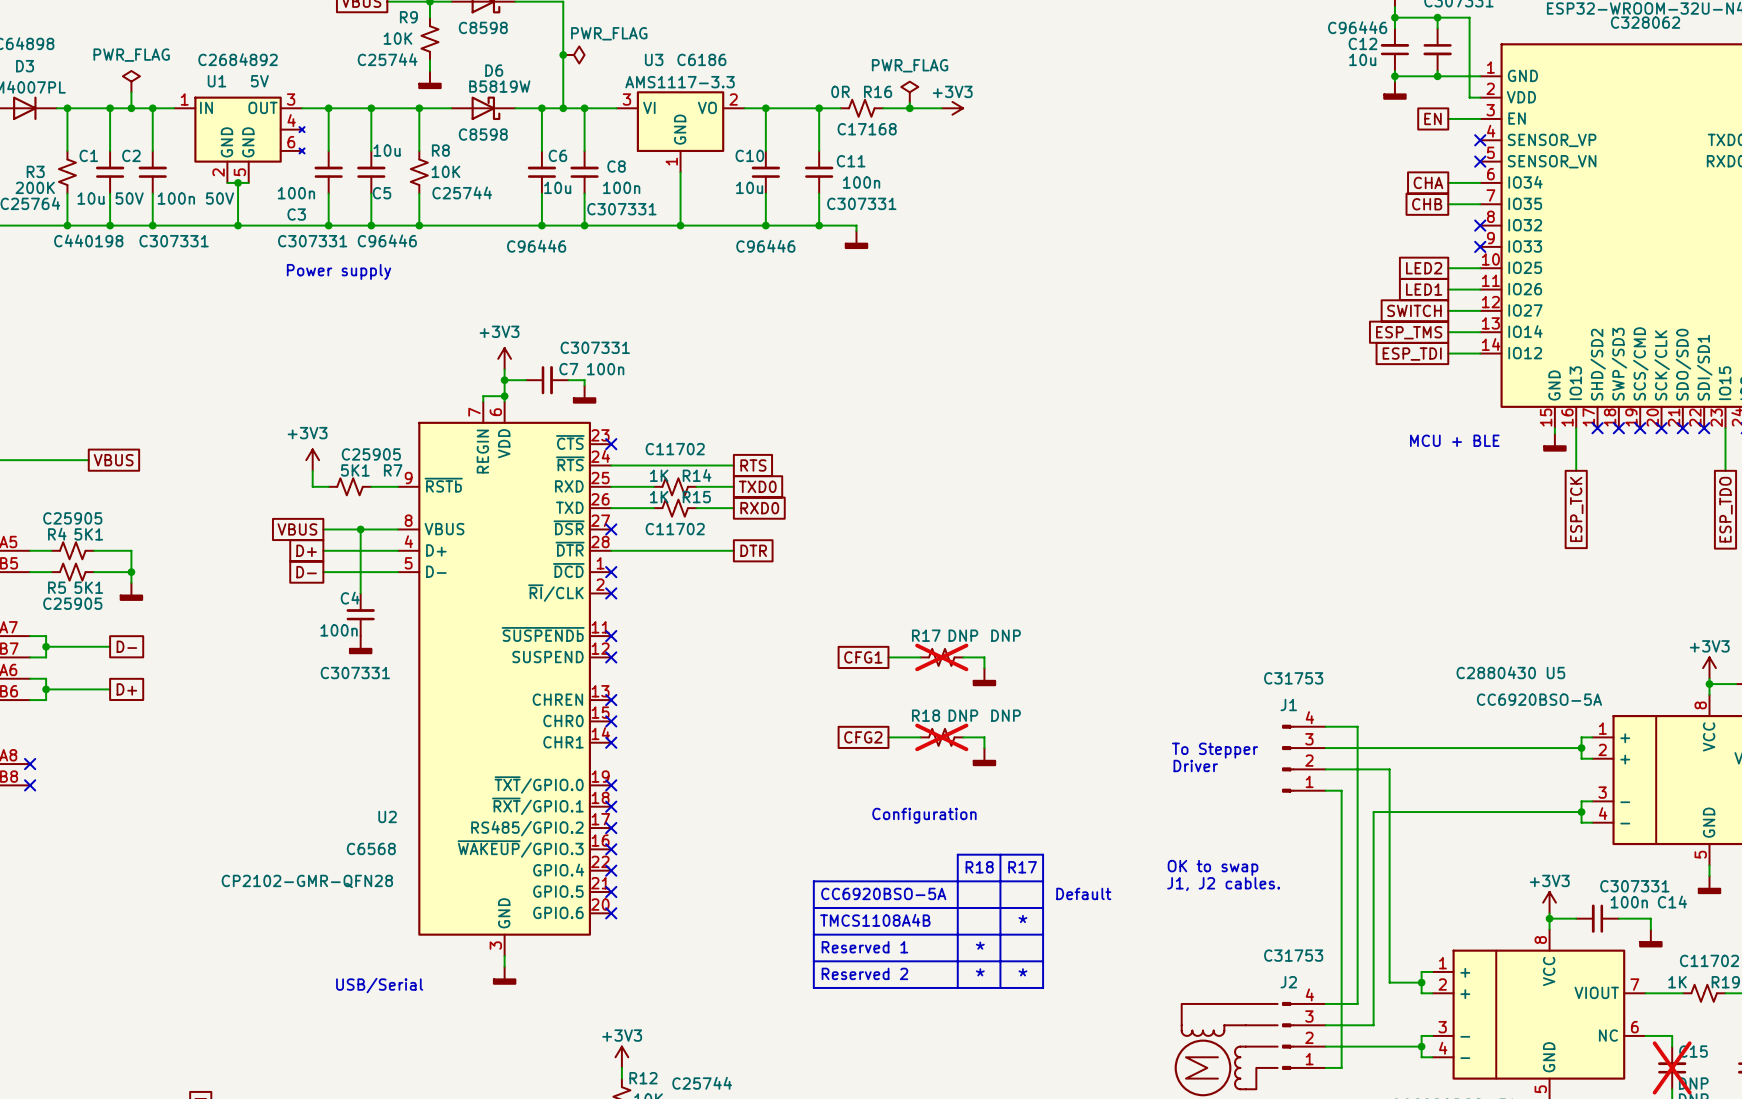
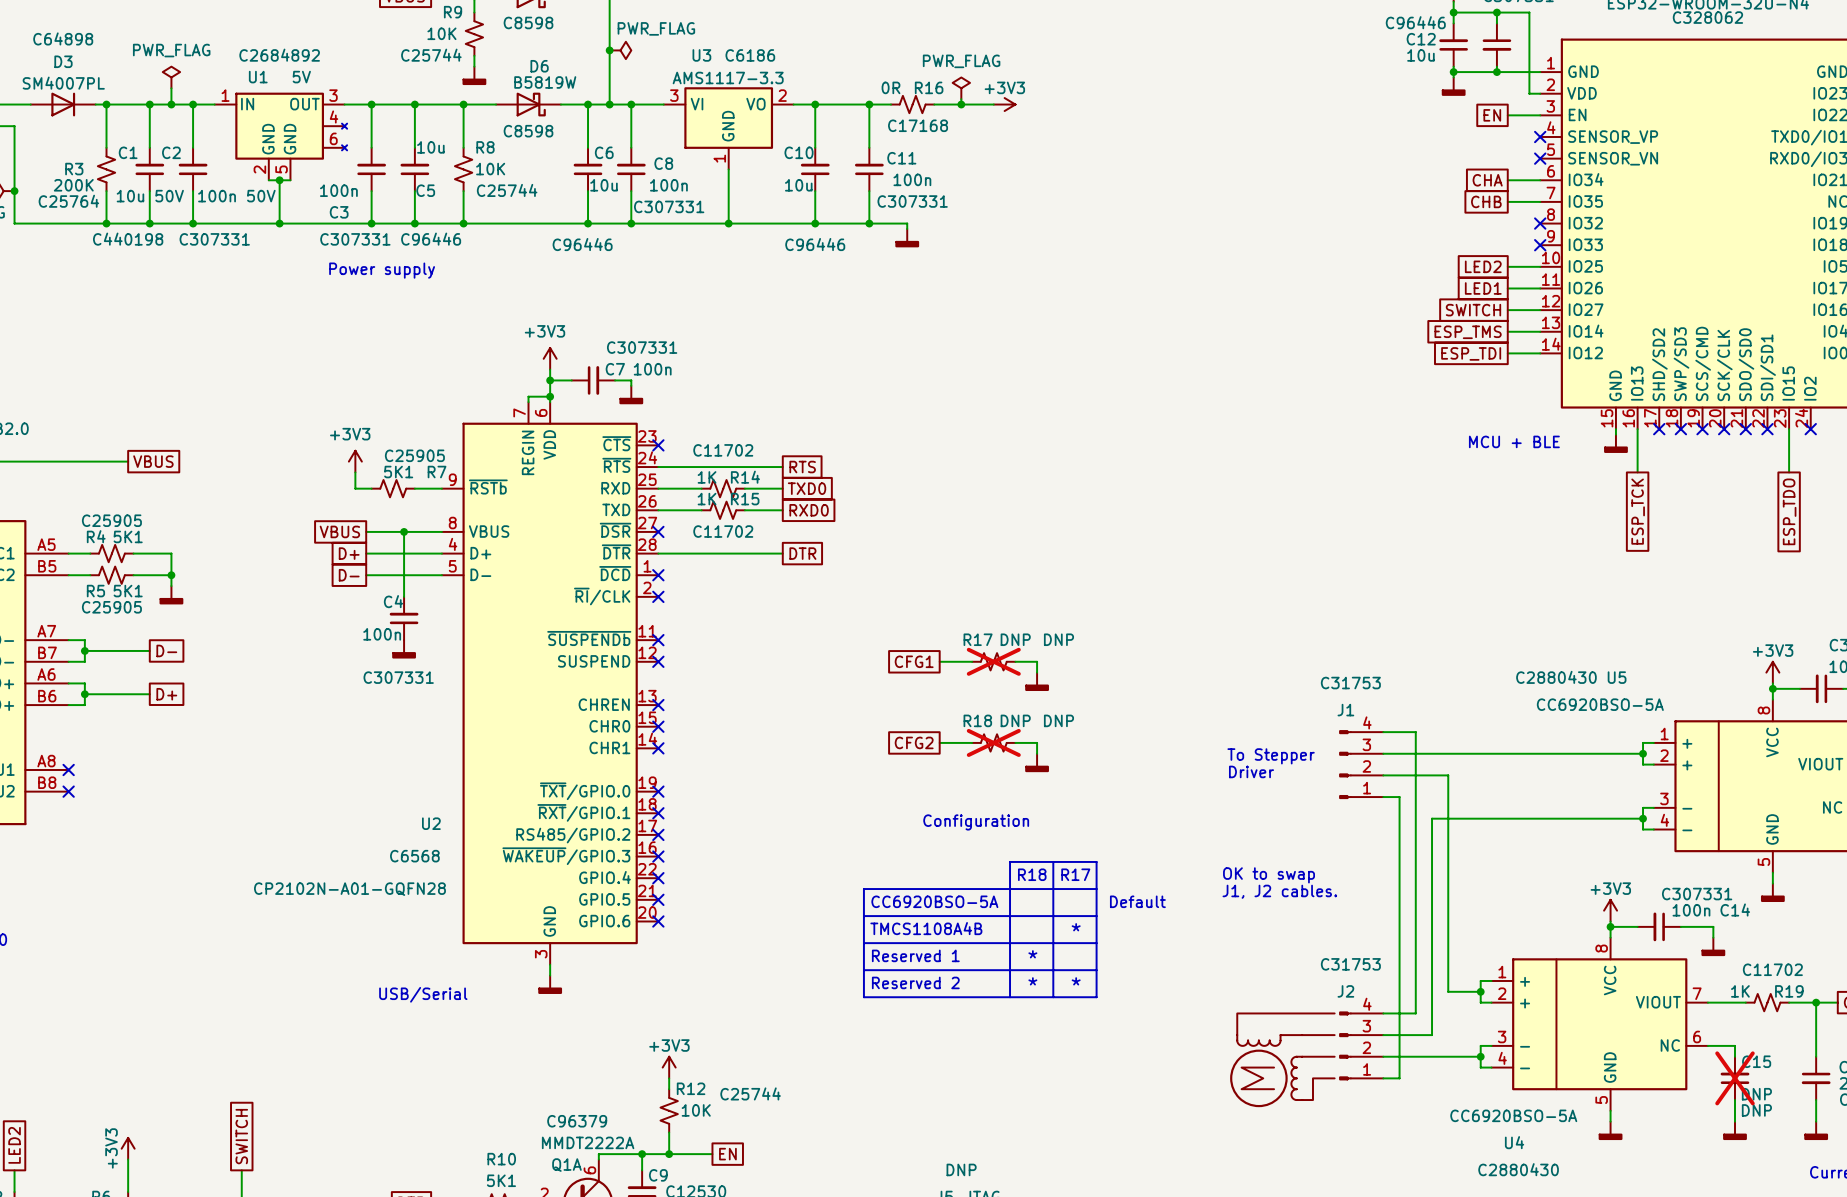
U2 value: CP2102-GMR-QFN28 (307, 881) -> CP2102N-A01-GQFN28 (349, 889)

